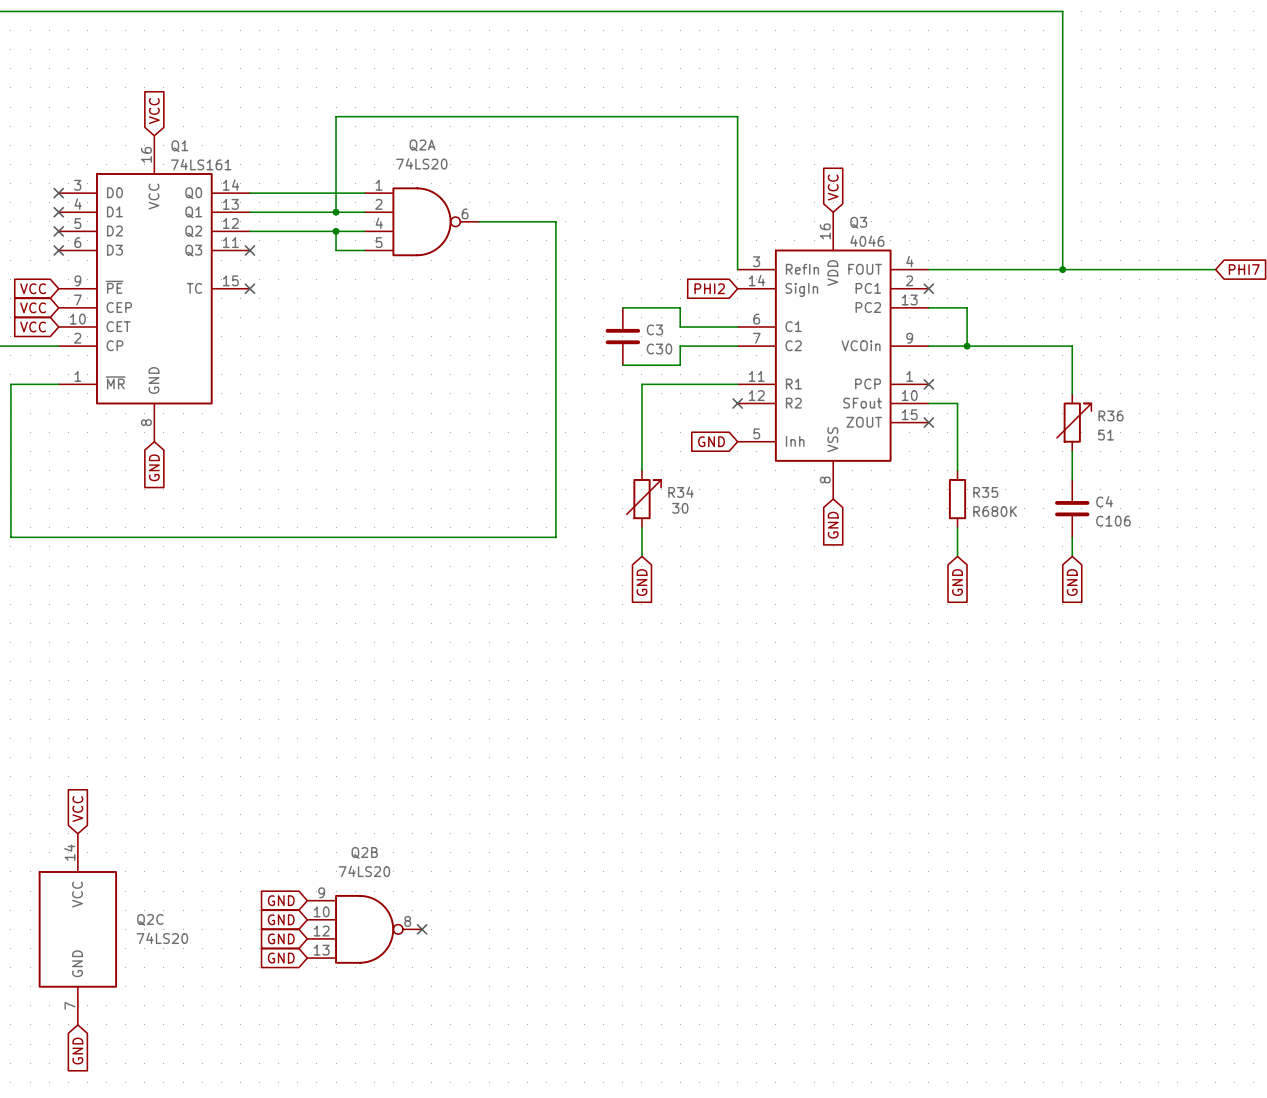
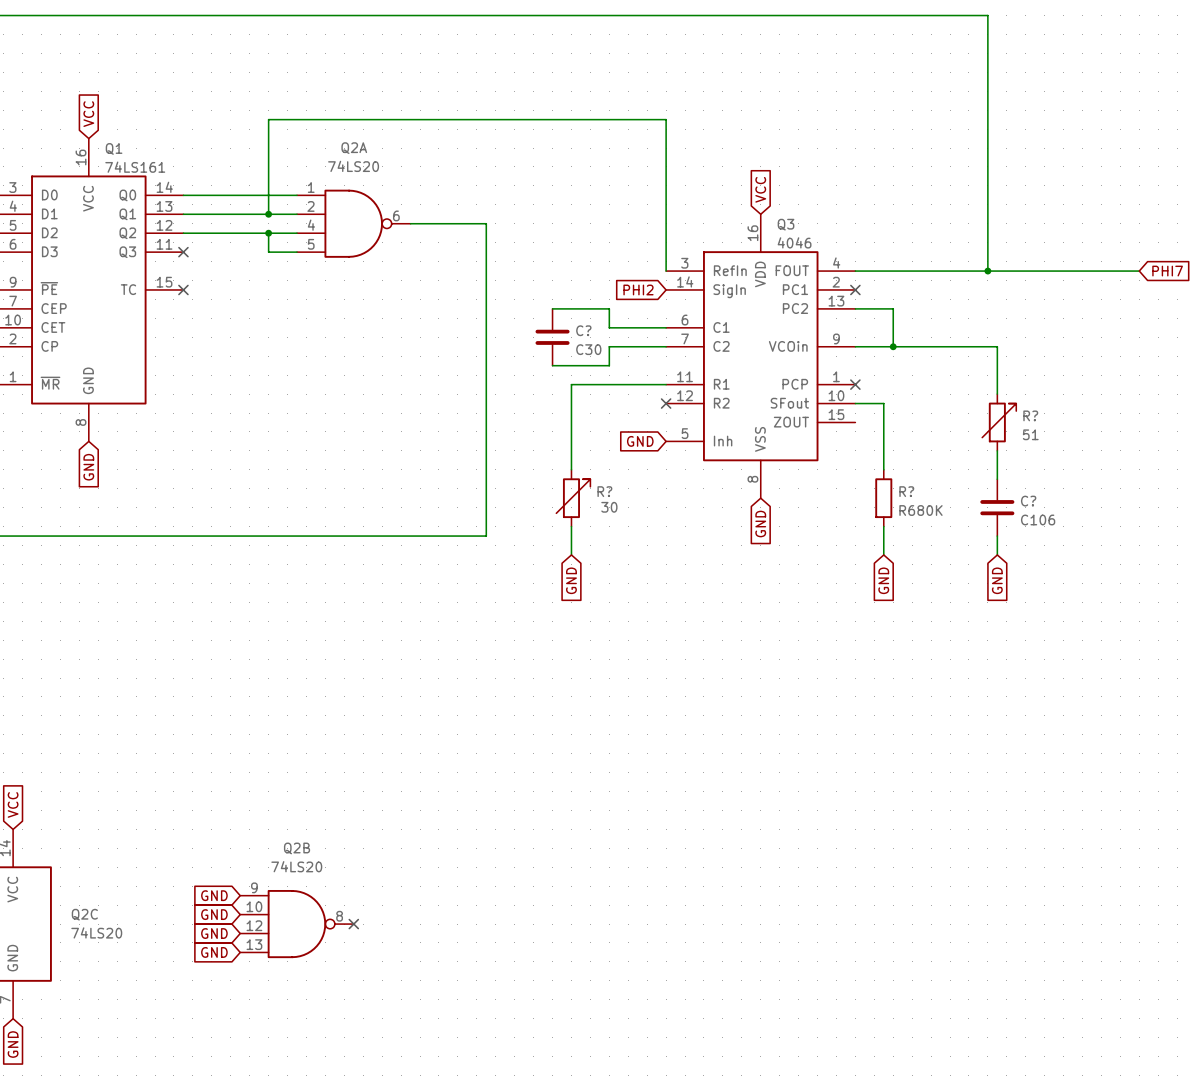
C3 name: C3 (654, 329) -> C? (583, 330)
R36 name: R36 (1111, 415) -> R? (1030, 415)
no-connect mark: (928, 422) -> none
R34 name: R34 (680, 492) -> R? (604, 491)
R35 name: R35 (985, 492) -> R? (906, 491)
C4 name: C4 (1104, 501) -> C? (1028, 501)

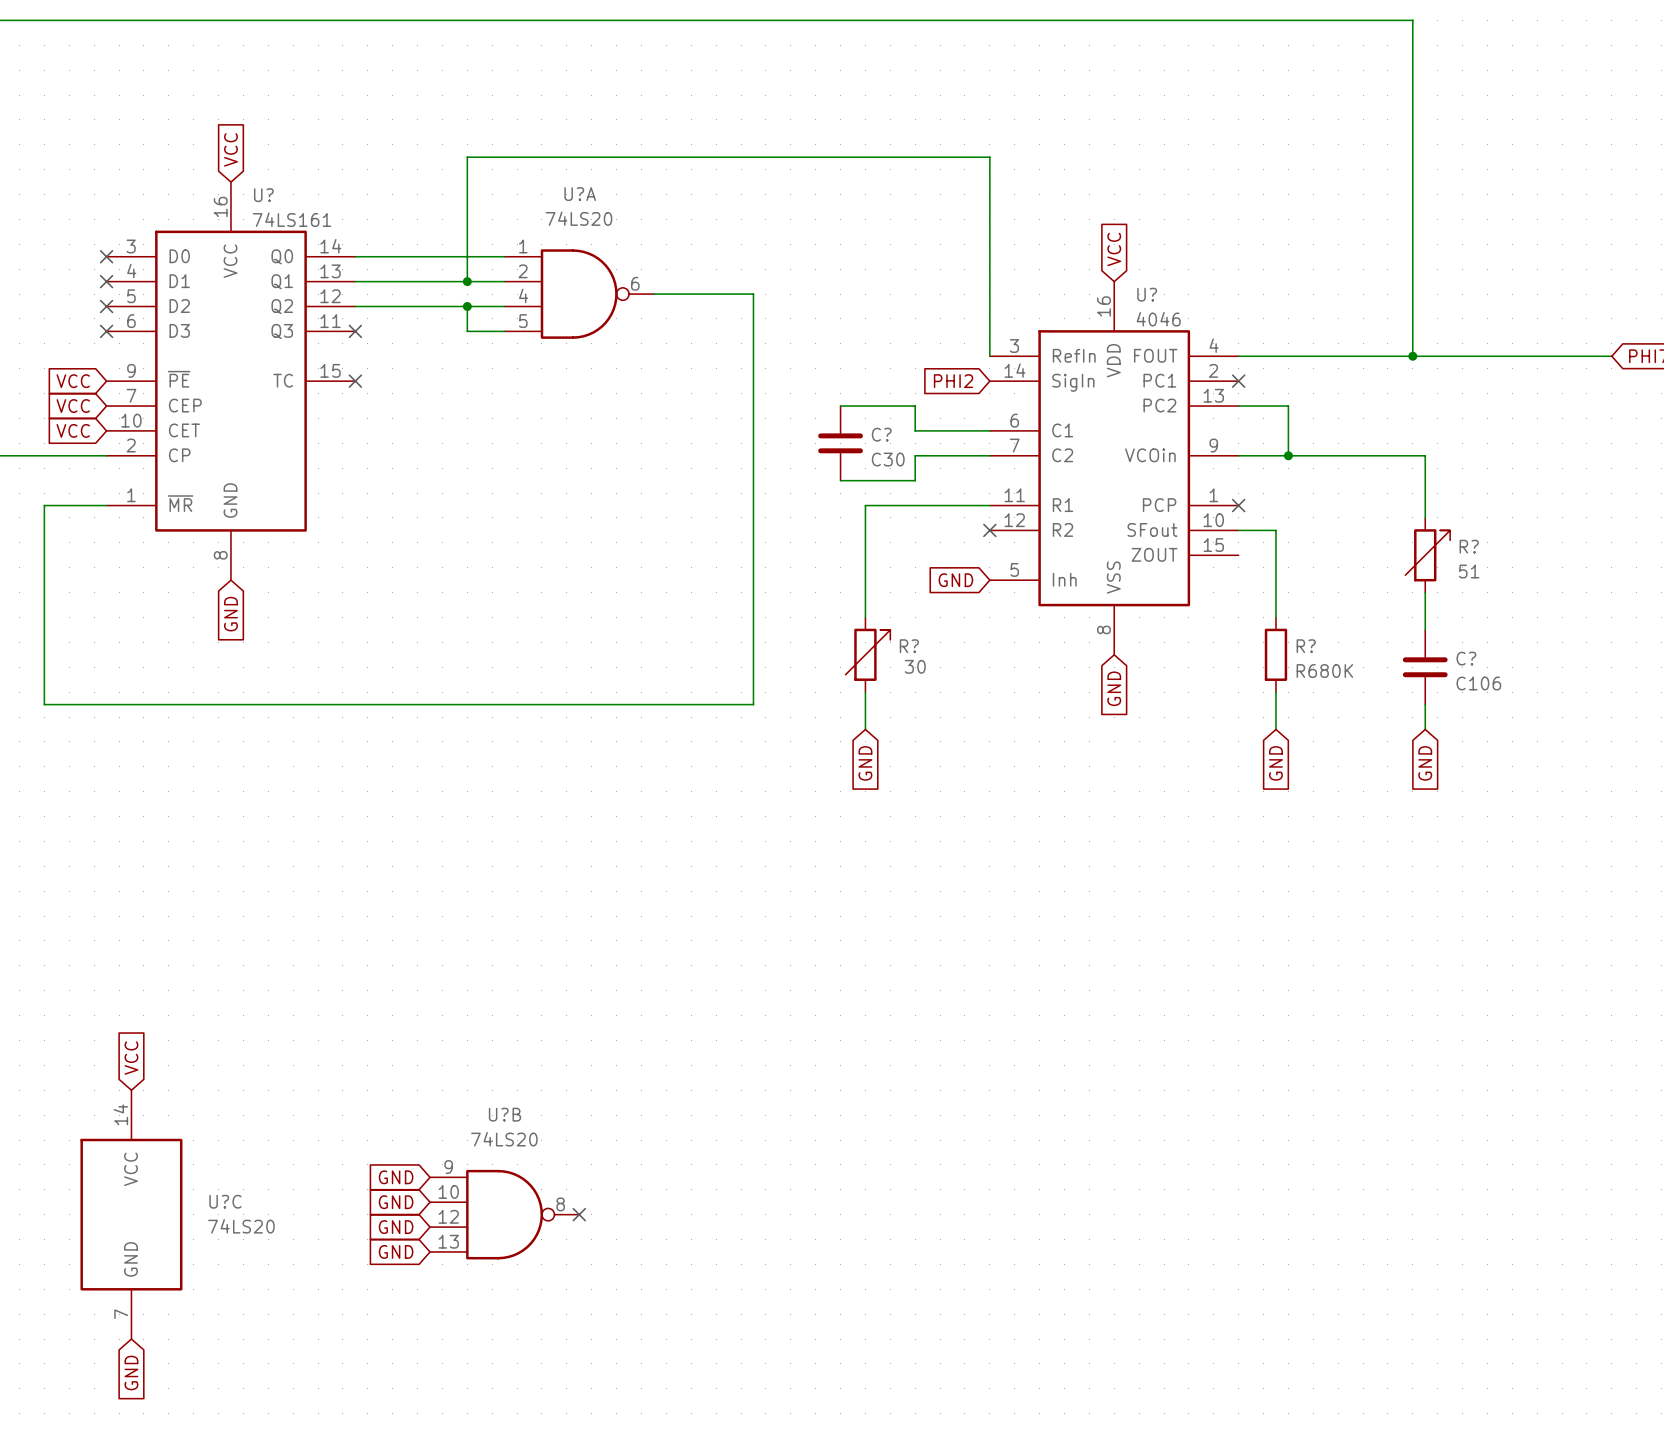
Q1 name: Q1 (114, 148) -> U? (263, 195)
Q2A name: Q2A (354, 148) -> U?A (580, 194)
Q3 name: Q3 (786, 224) -> U? (1147, 294)
Q2B name: Q2B (297, 848) -> U?B (504, 1114)
Q2C name: Q2C (84, 914) -> U?C (225, 1201)

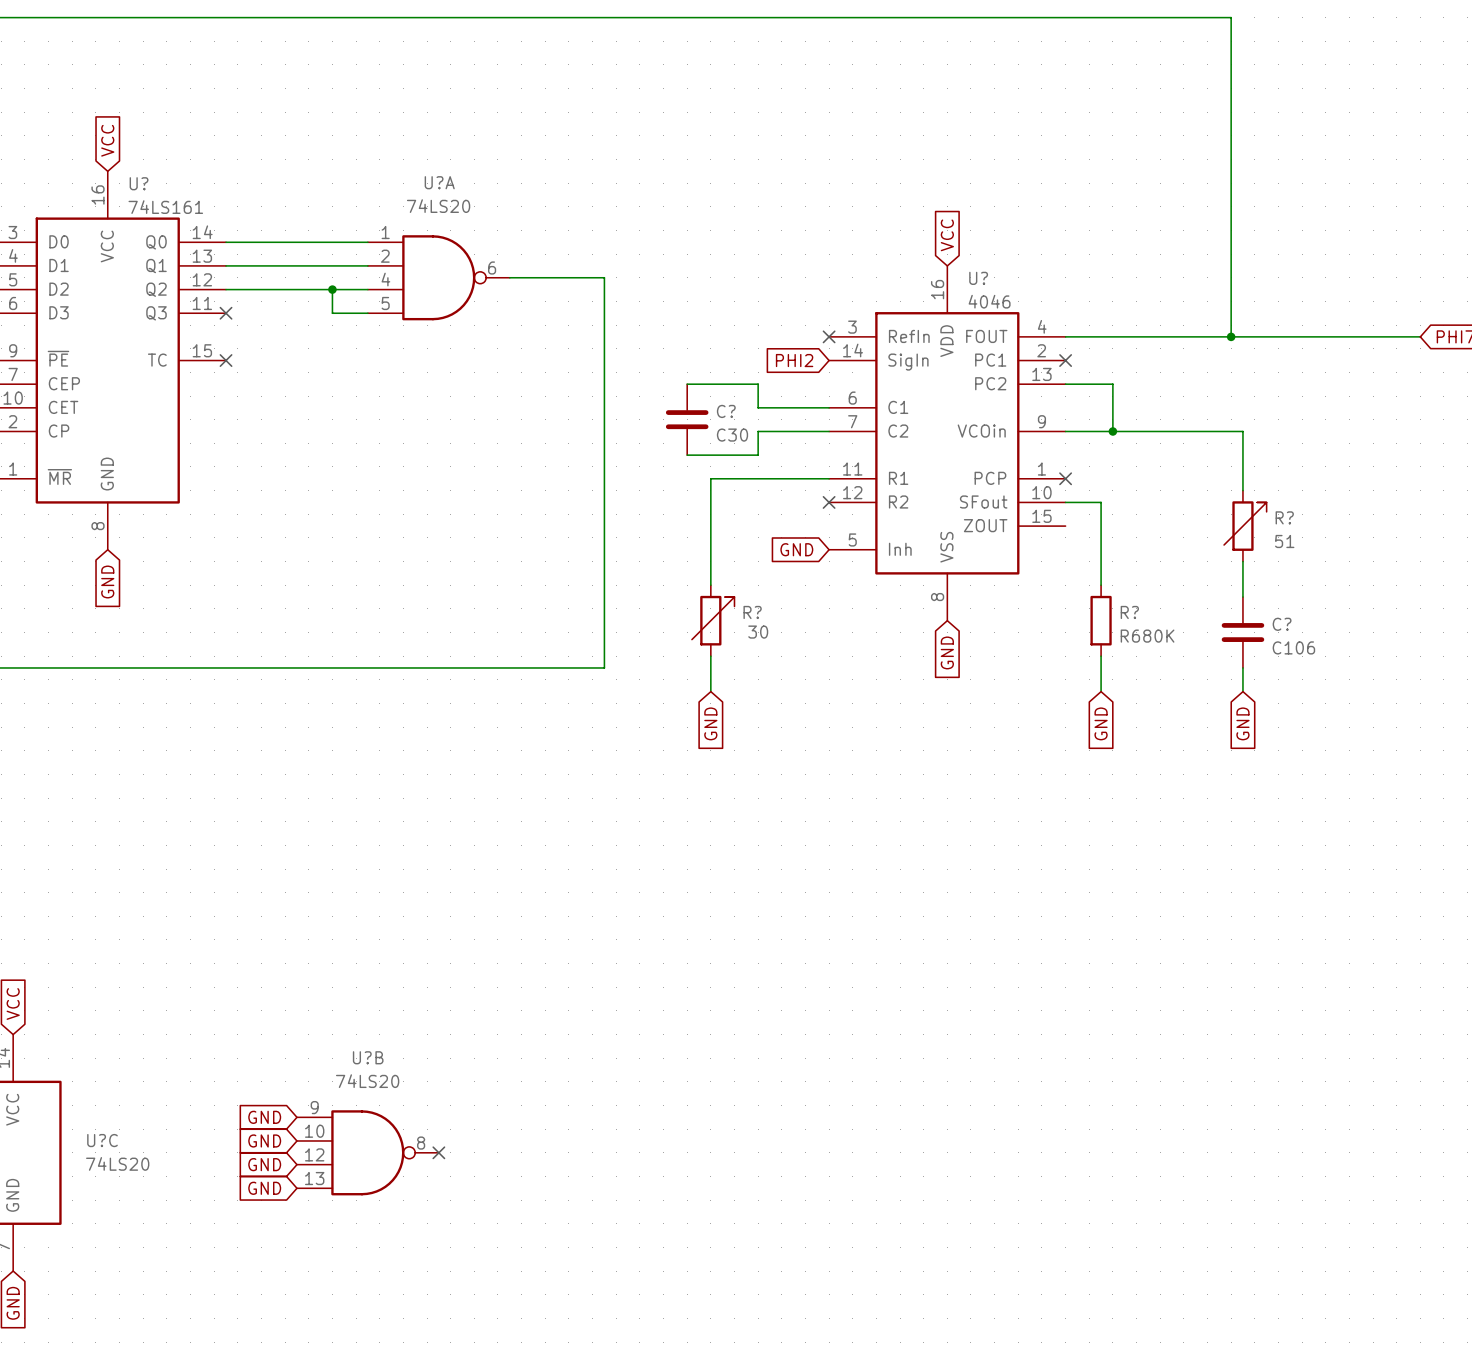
wire: (467, 281) (467, 157) (989, 157) (989, 356) -> none
junction: (467, 281) -> none
no-connect mark: none -> (829, 336)

